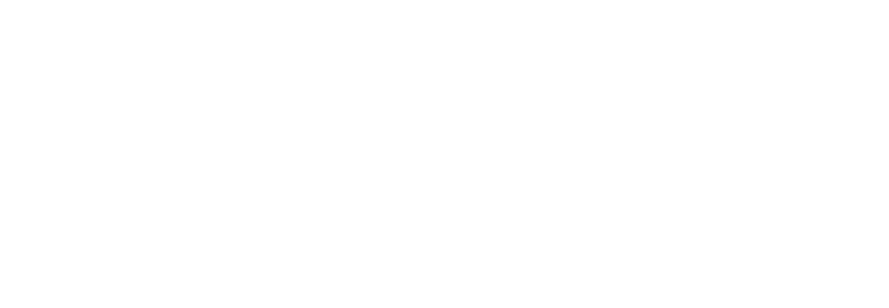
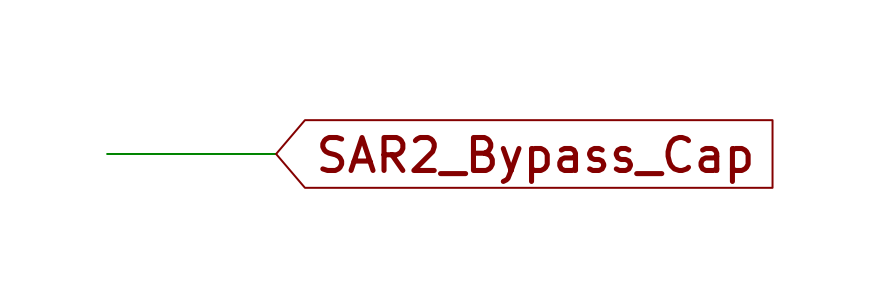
wire: none -> (107, 153) (276, 153)
global label: none -> SAR2_Bypass_Cap (535, 159)

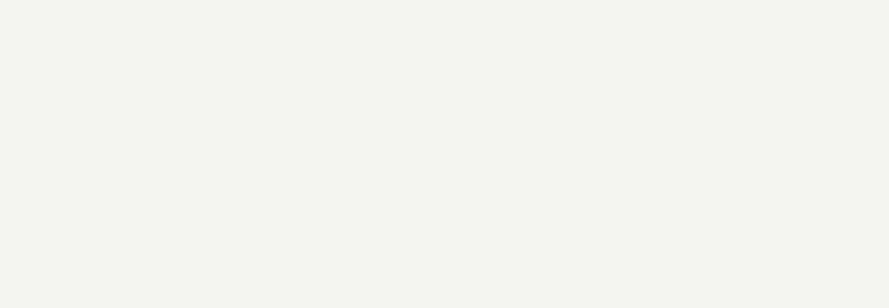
wire: (107, 153) (276, 153) -> none
global label: SAR2_Bypass_Cap (535, 159) -> none

